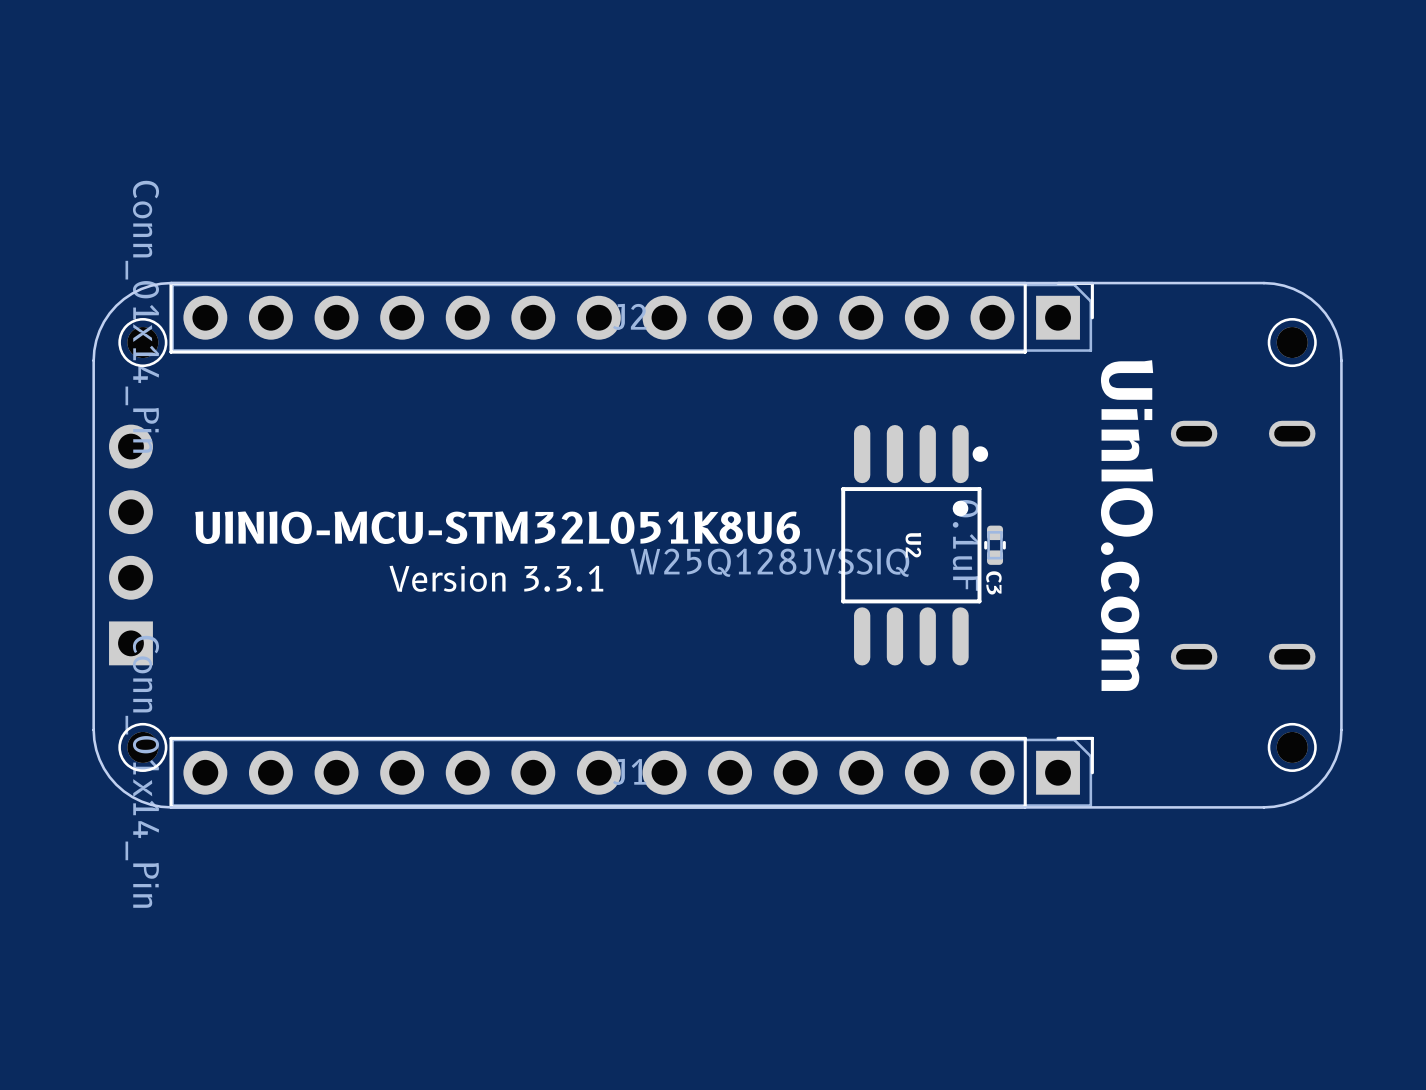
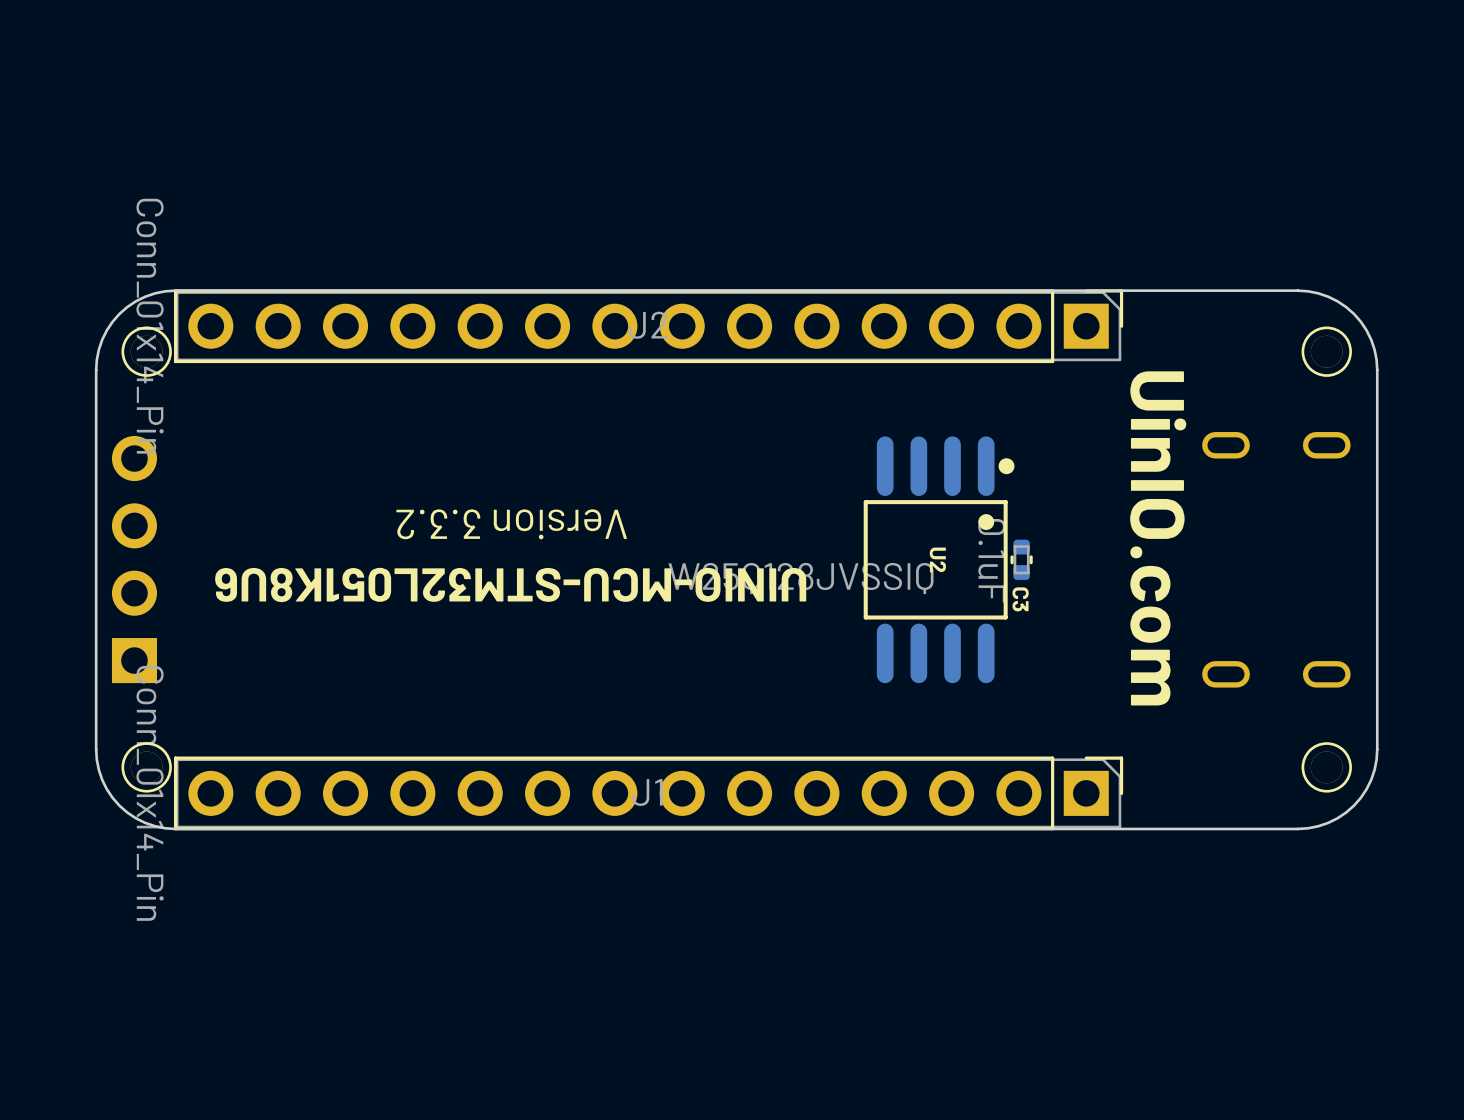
text: UINIO-MCU-STM32L051K8U6 (497, 527) -> Version 3.3.2 (511, 524)
text: Version 3.3.1 (496, 578) -> UINIO-MCU-STM32L051K8U6 (510, 584)

